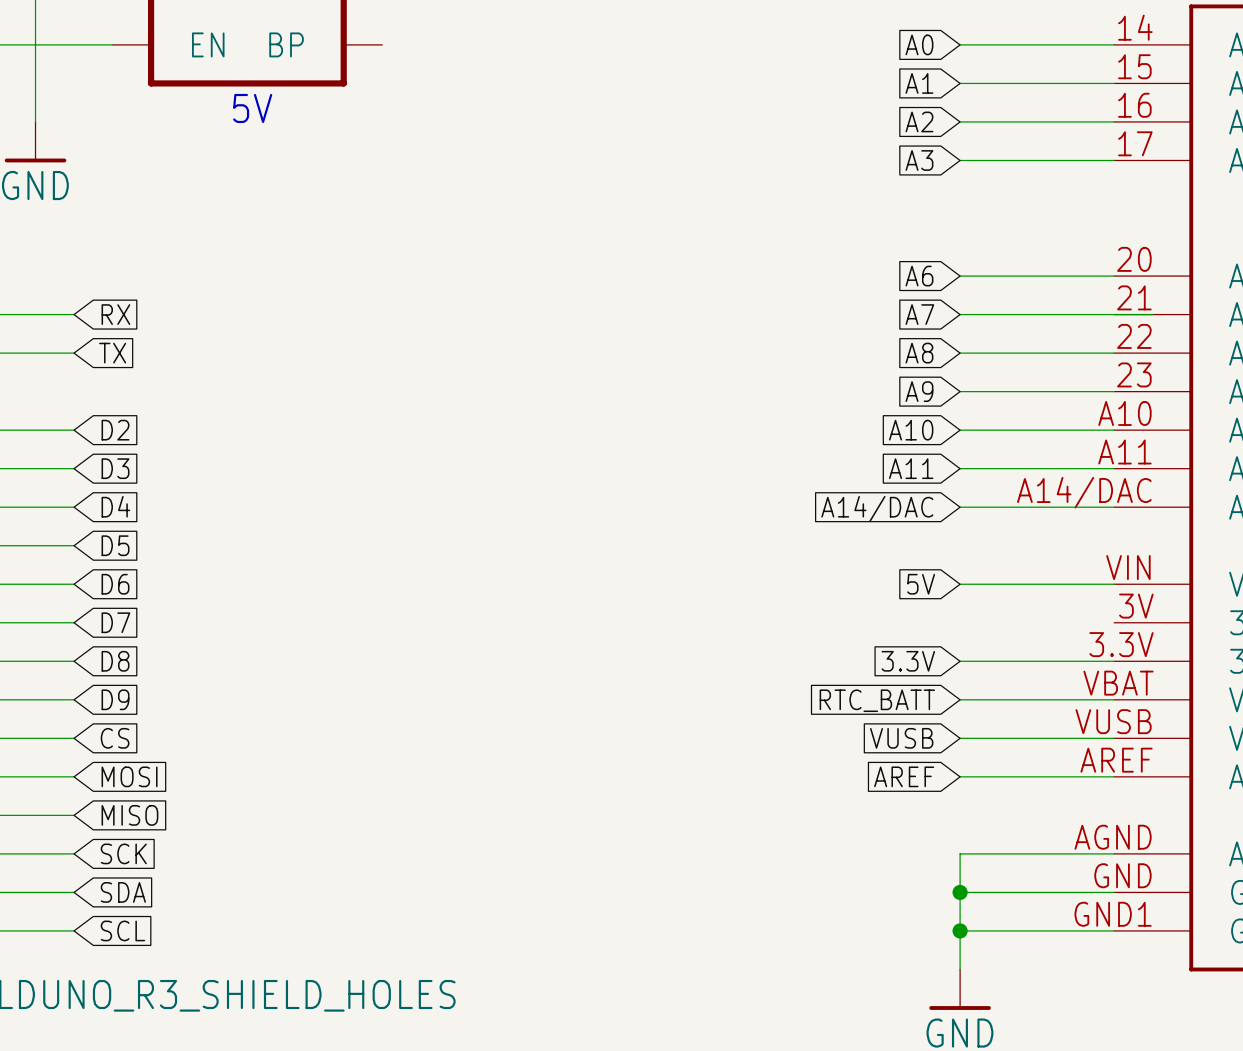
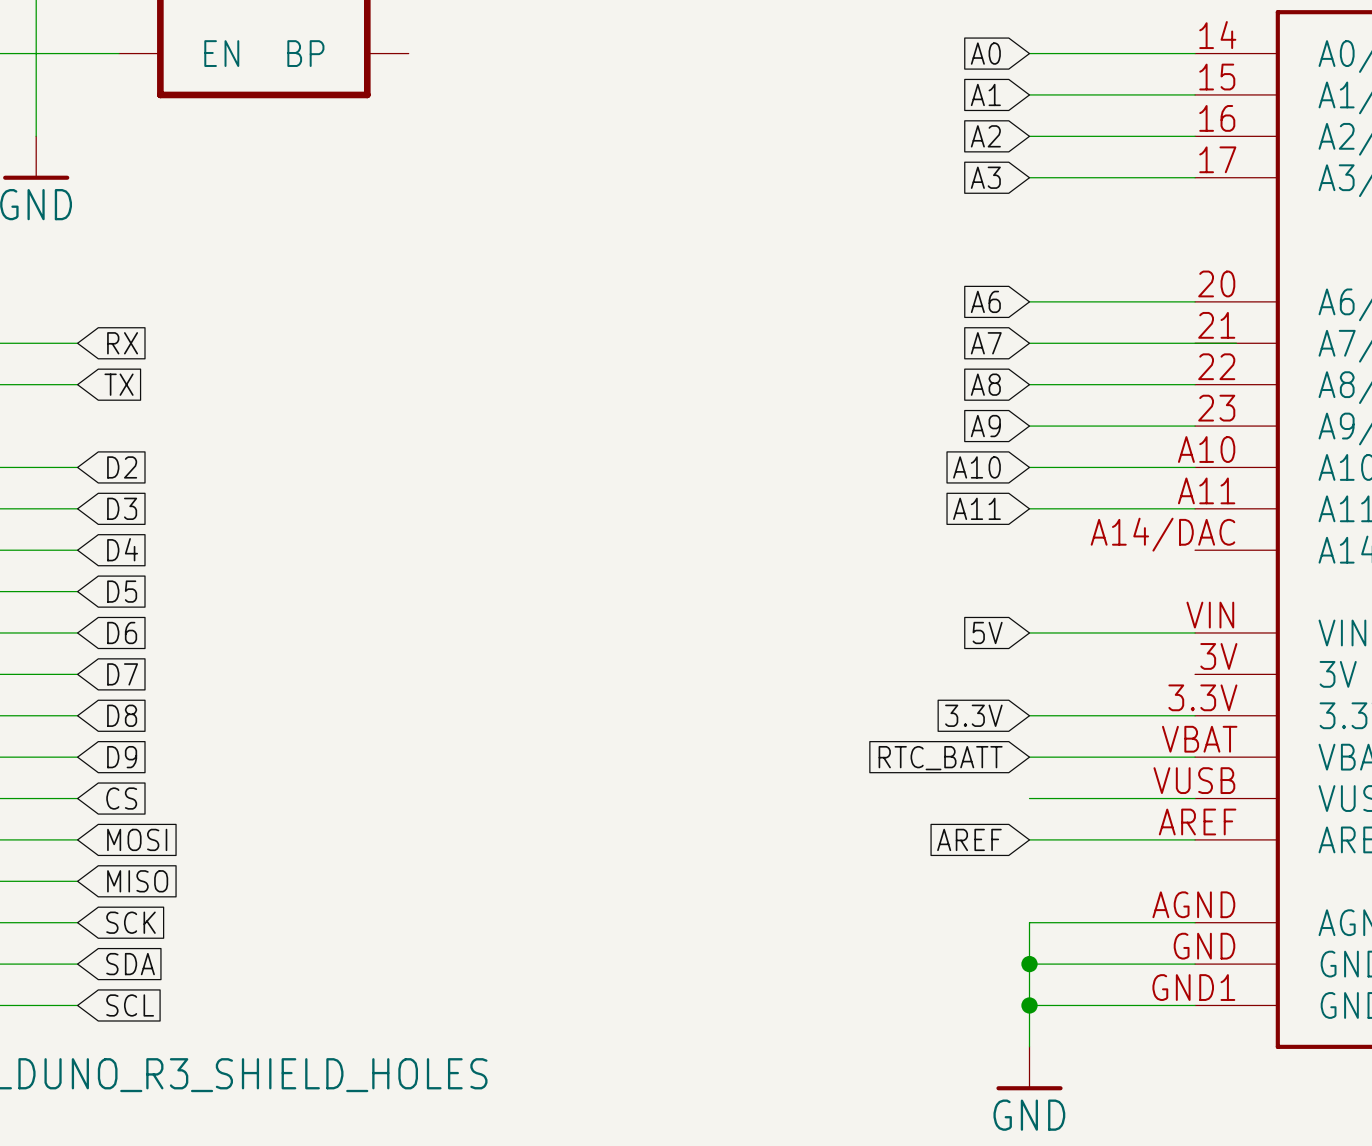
text: 5V (252, 108) -> none
wire: (960, 507) (1114, 507) -> none
global label: A14/DAC (877, 509) -> none
global label: VUSB (901, 738) -> none

